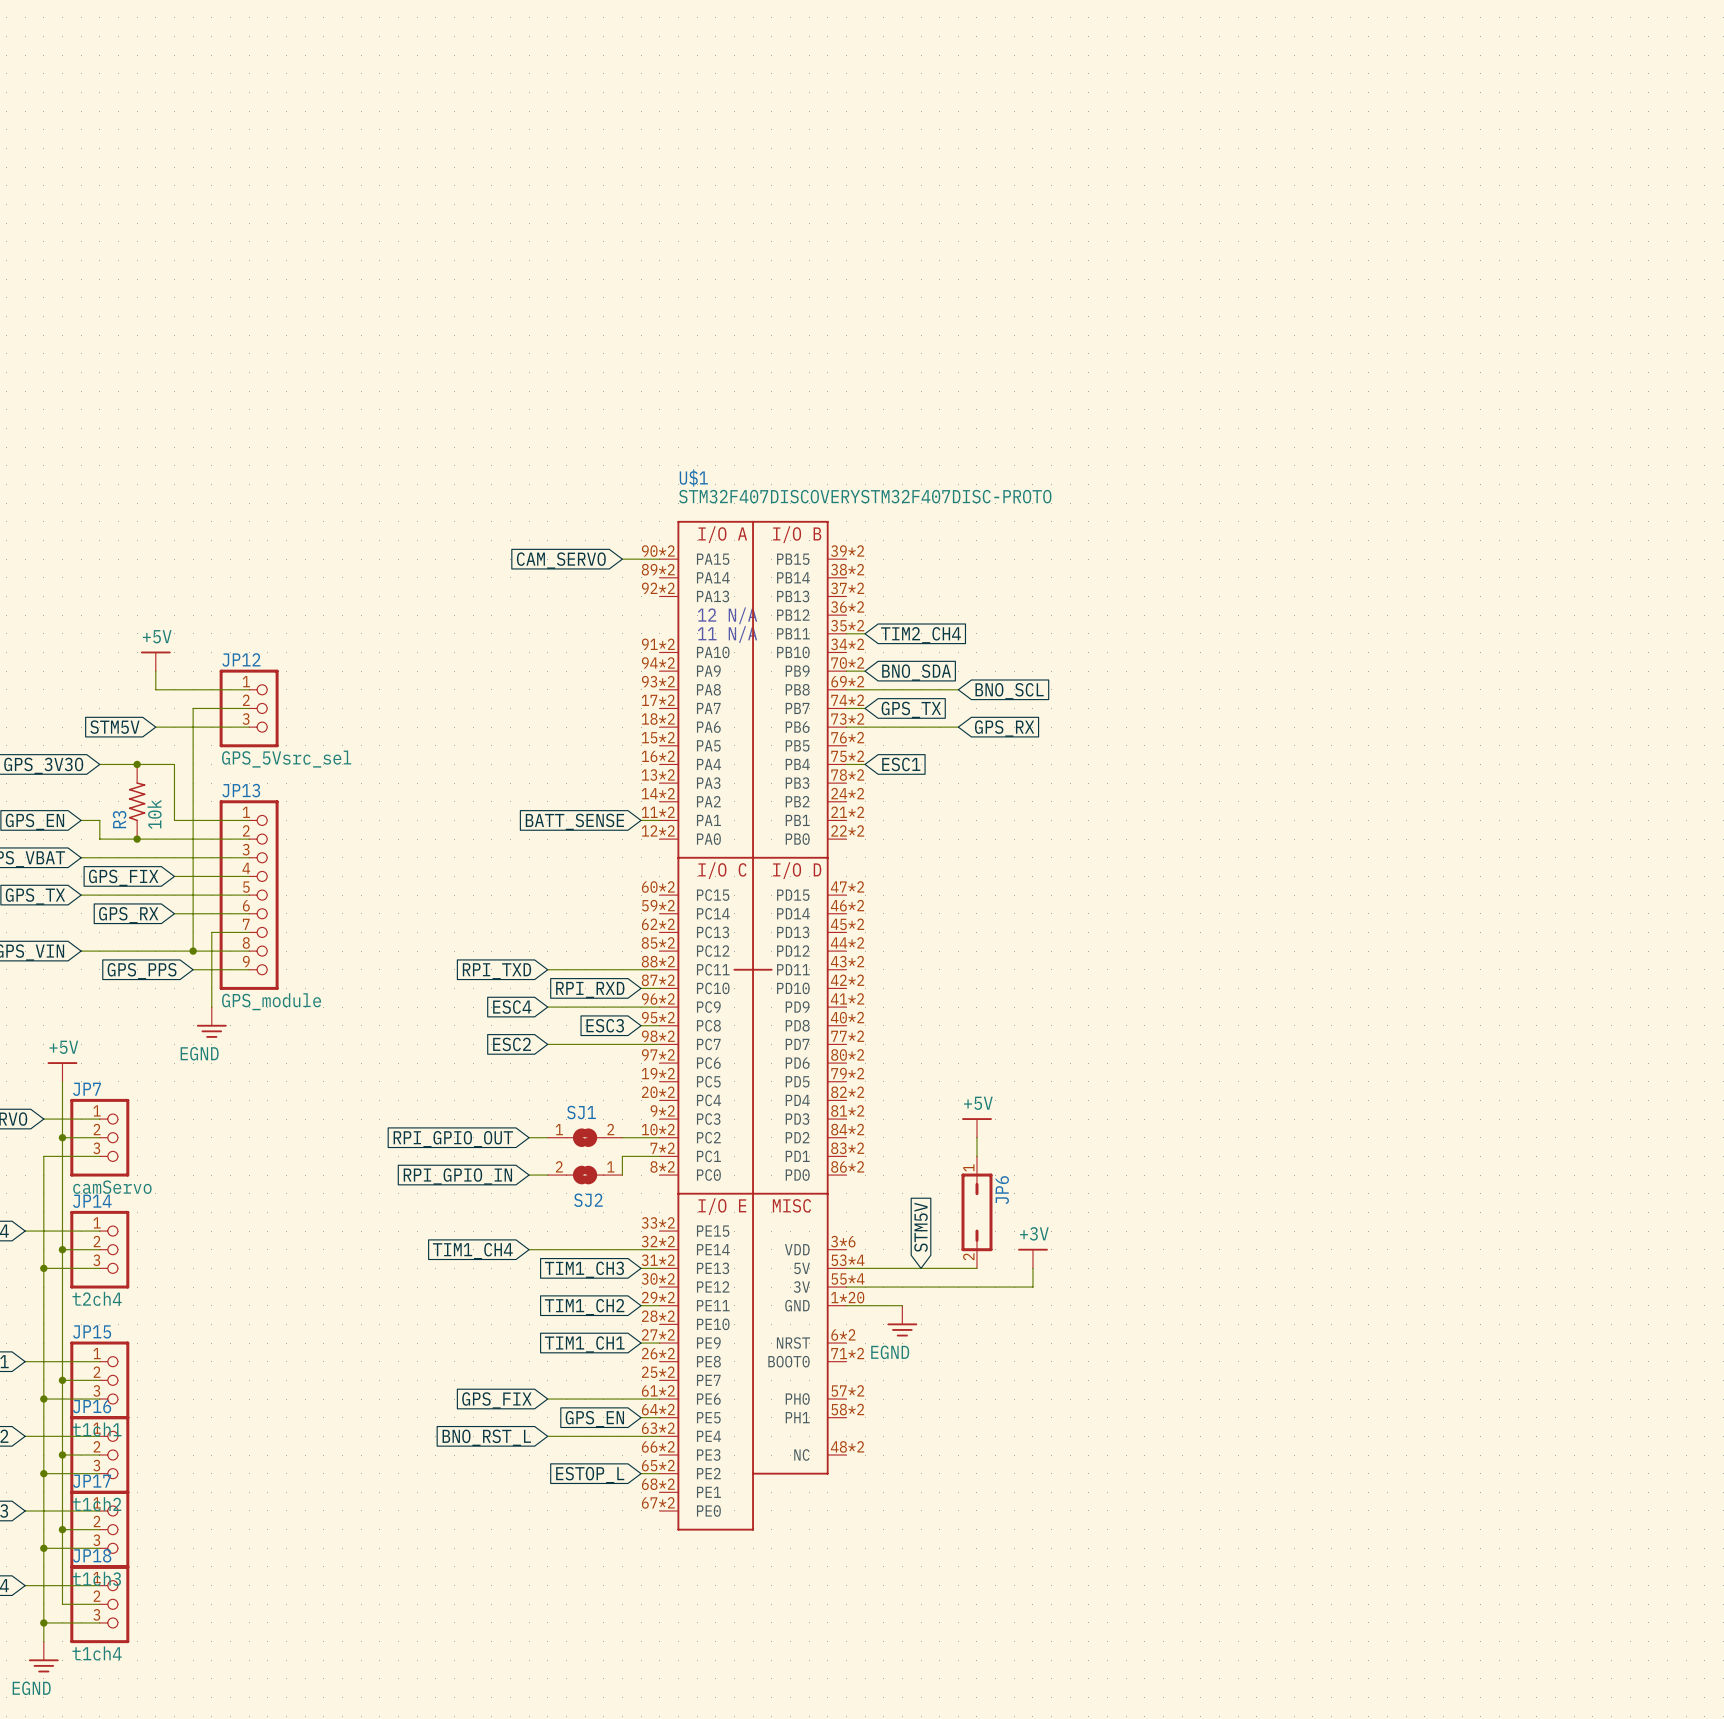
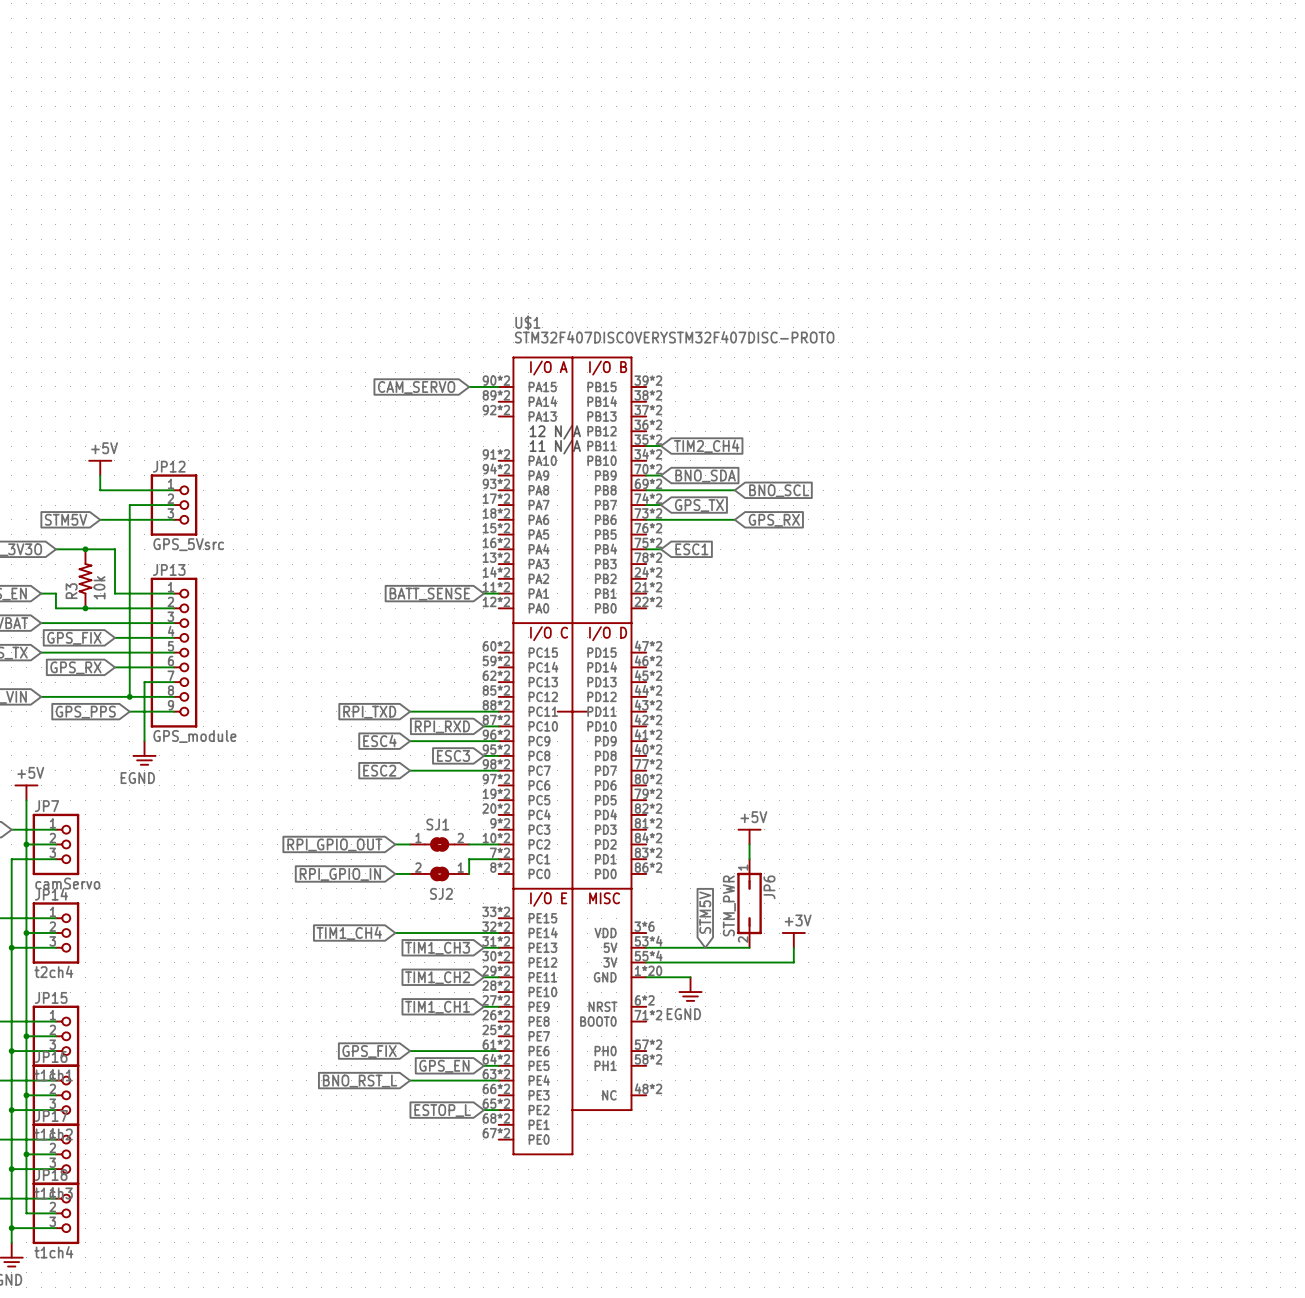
JP12 value: GPS_5Vsrc_sel (286, 759) -> GPS_5Vsrc (188, 544)
JP6 value: none -> STM_PWR (729, 905)

